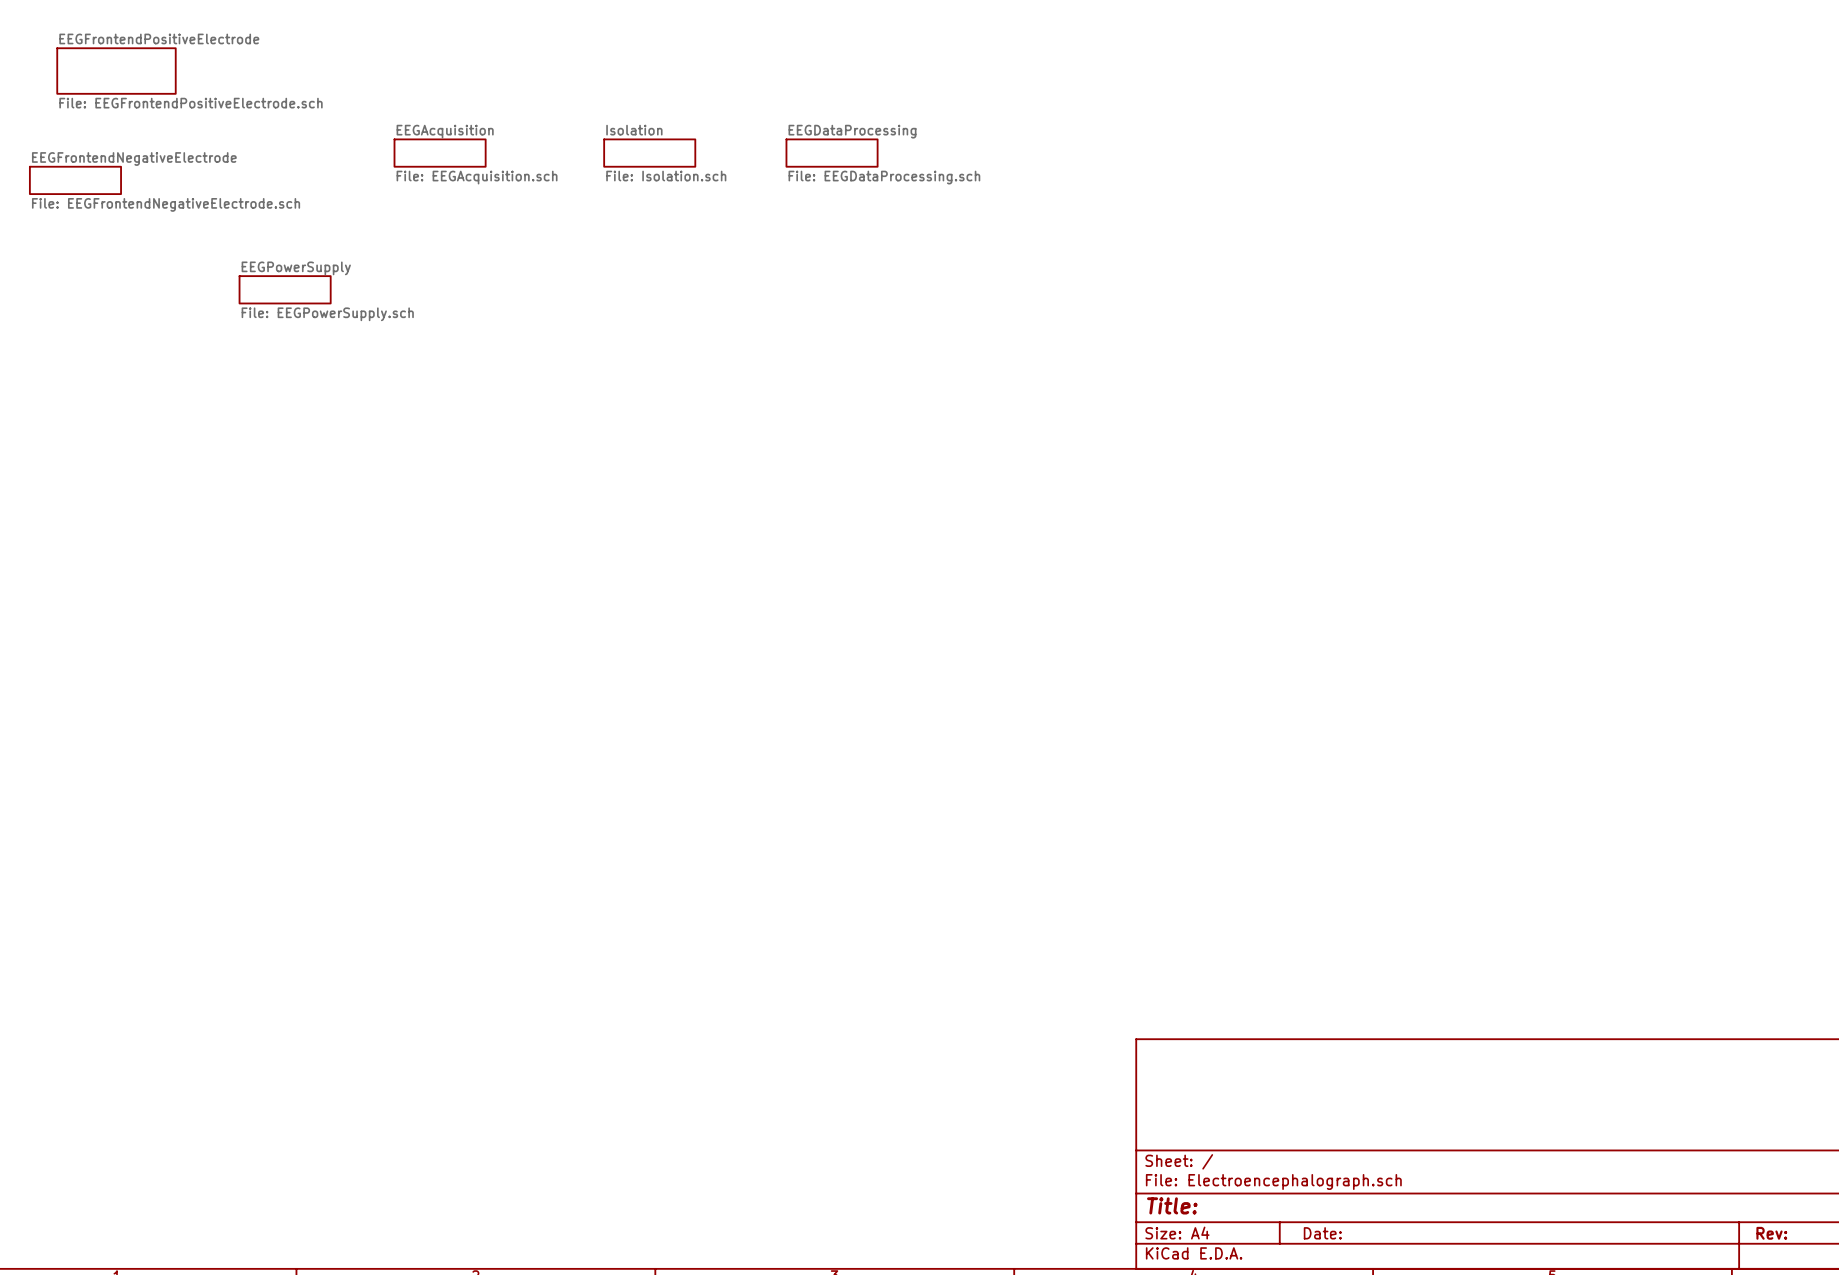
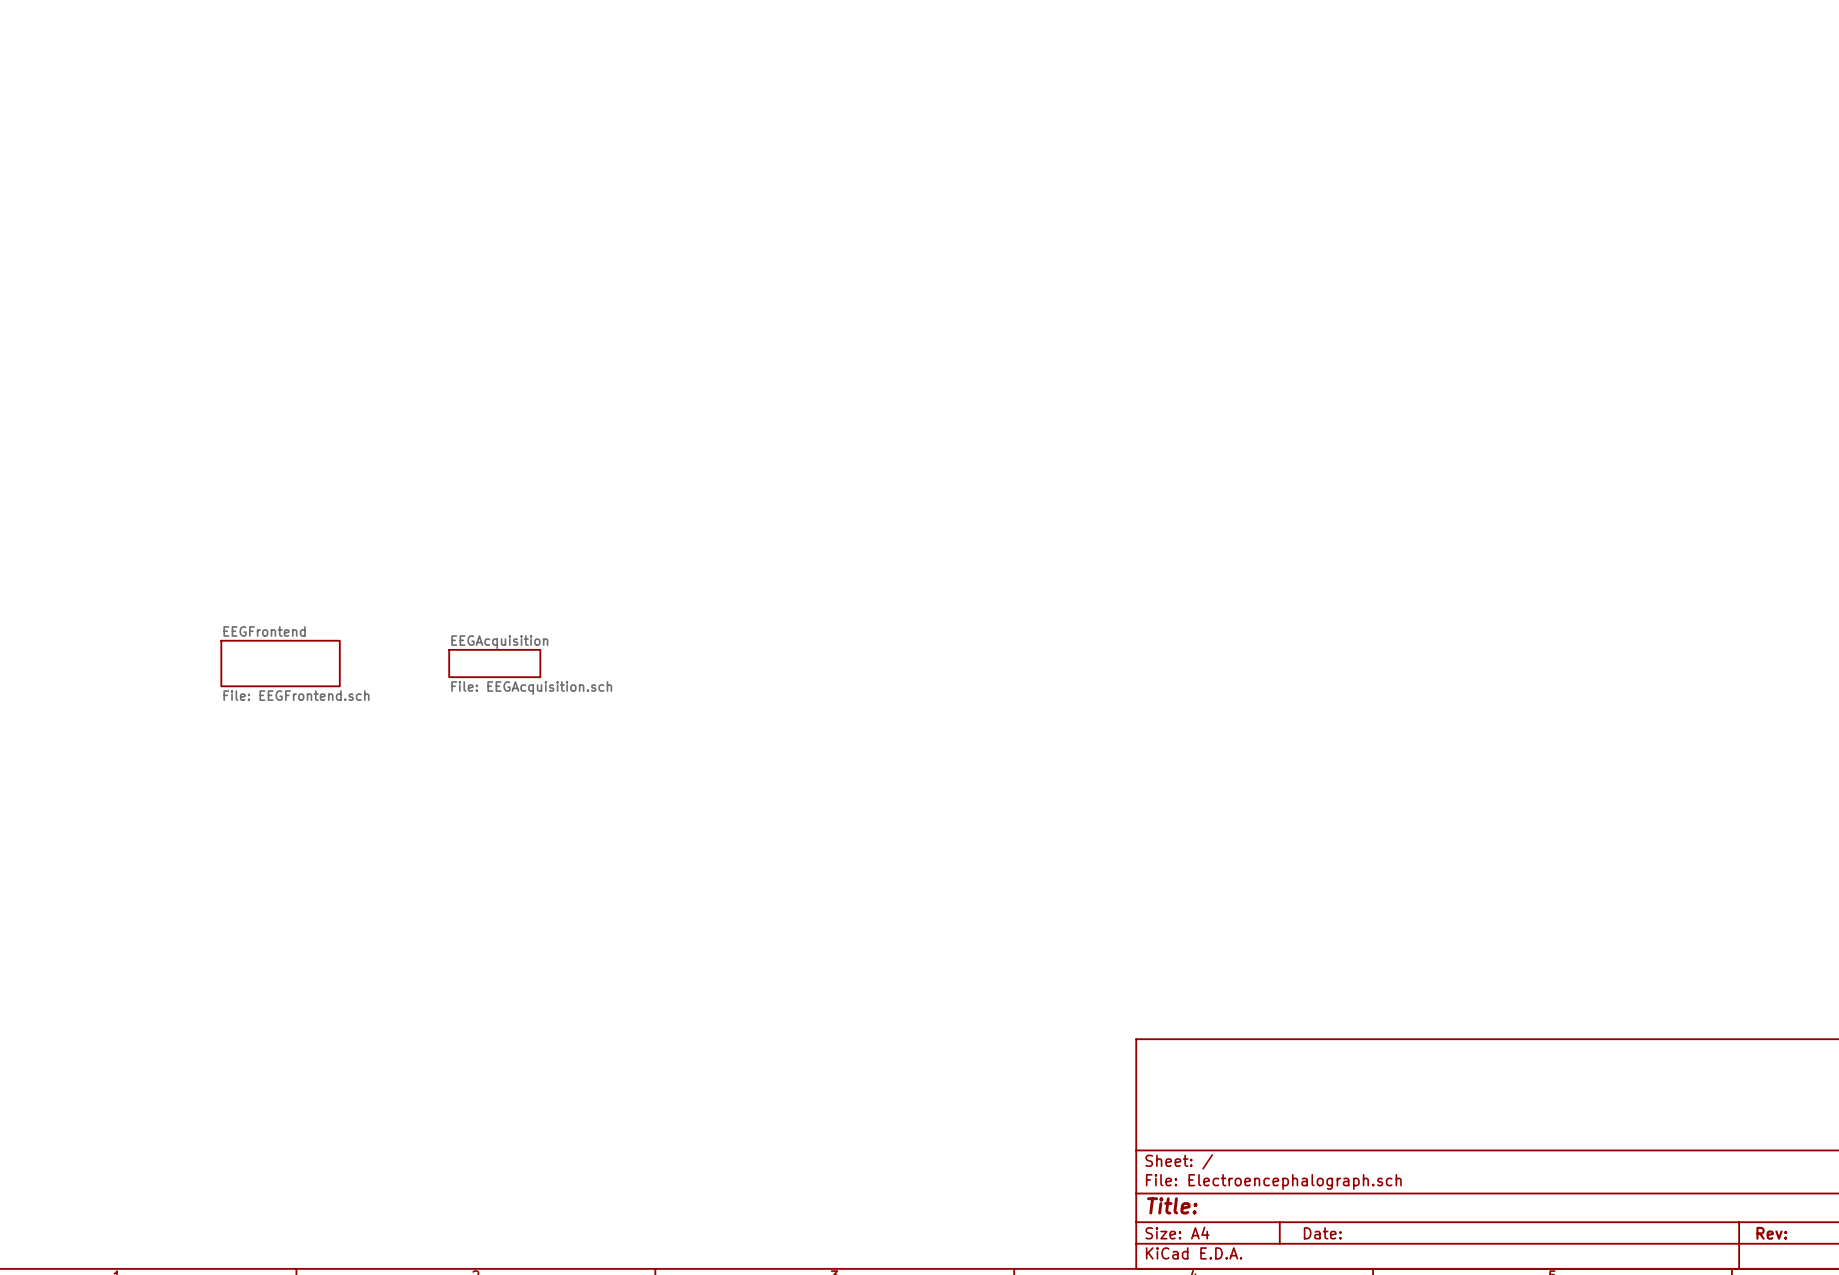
sheet EEGFrontendPositiveElectrode: File: EEGFrontendPositiveElectrode.sch (116, 71) -> none
sheet EEGAcquisition: File: EEGAcquisition.sch (440, 153) -> none
sheet Isolation: File: Isolation.sch (649, 153) -> none
sheet EEGDataProcessing: File: EEGDataProcessing.sch (832, 153) -> none
sheet EEGFrontendNegativeElectrode: File: EEGFrontendNegativeElectrode.sch (75, 180) -> none
sheet EEGPowerSupply: File: EEGPowerSupply.sch (285, 289) -> none
sheet EEGFrontend: none -> File: EEGFrontend.sch (280, 663)
sheet EEGAcquisition: none -> File: EEGAcquisition.sch (494, 663)

